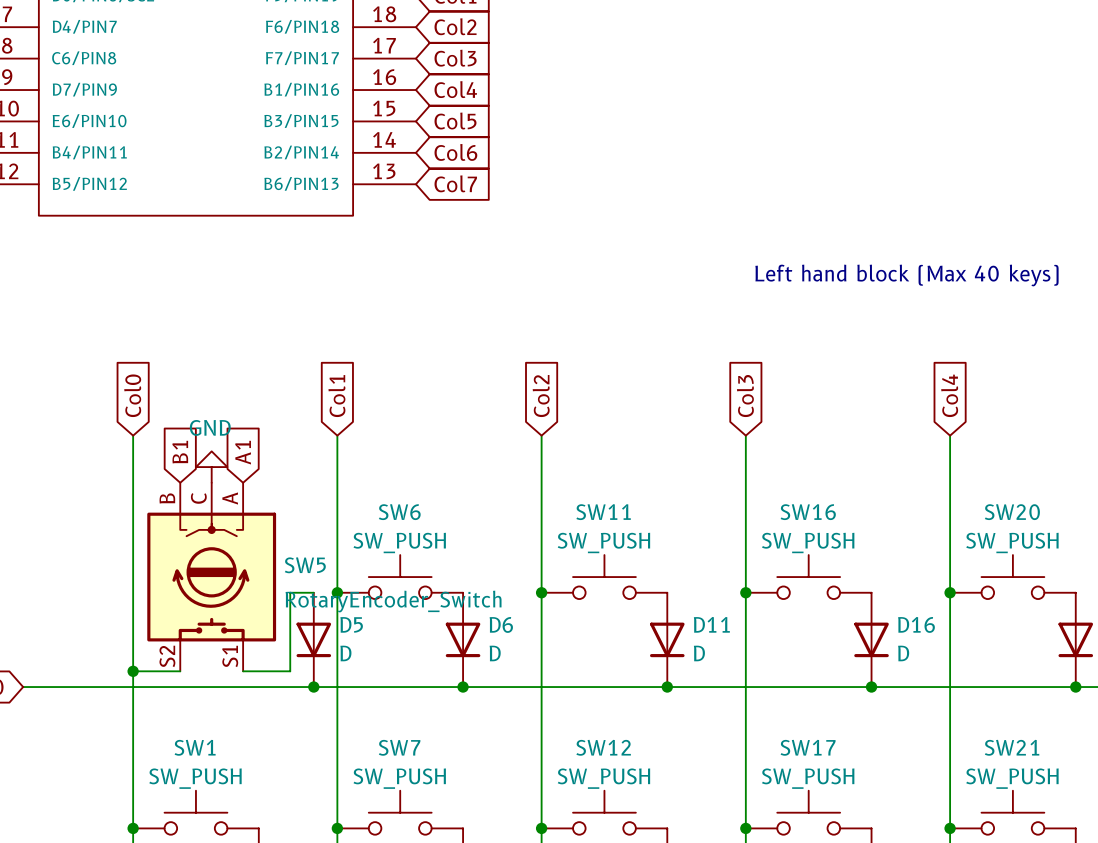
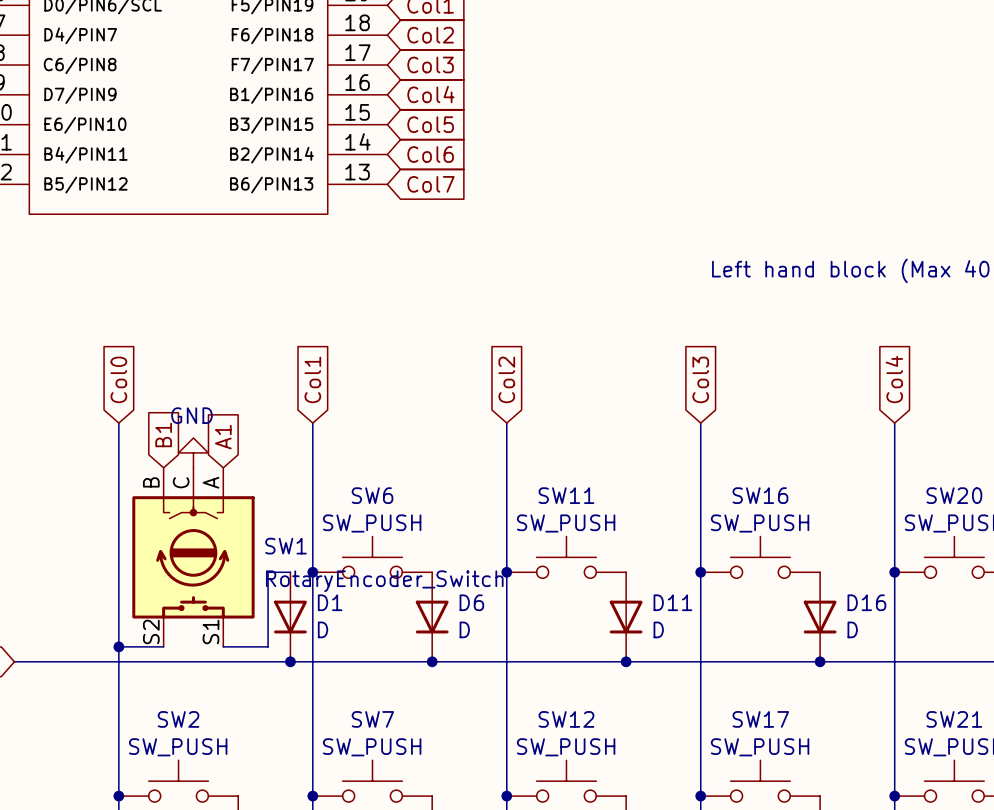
SW5 name: SW5 (305, 565) -> SW1 (286, 546)
D5 name: D5 (351, 624) -> D1 (330, 602)
SW1 name: SW1 (195, 747) -> SW2 (178, 719)

